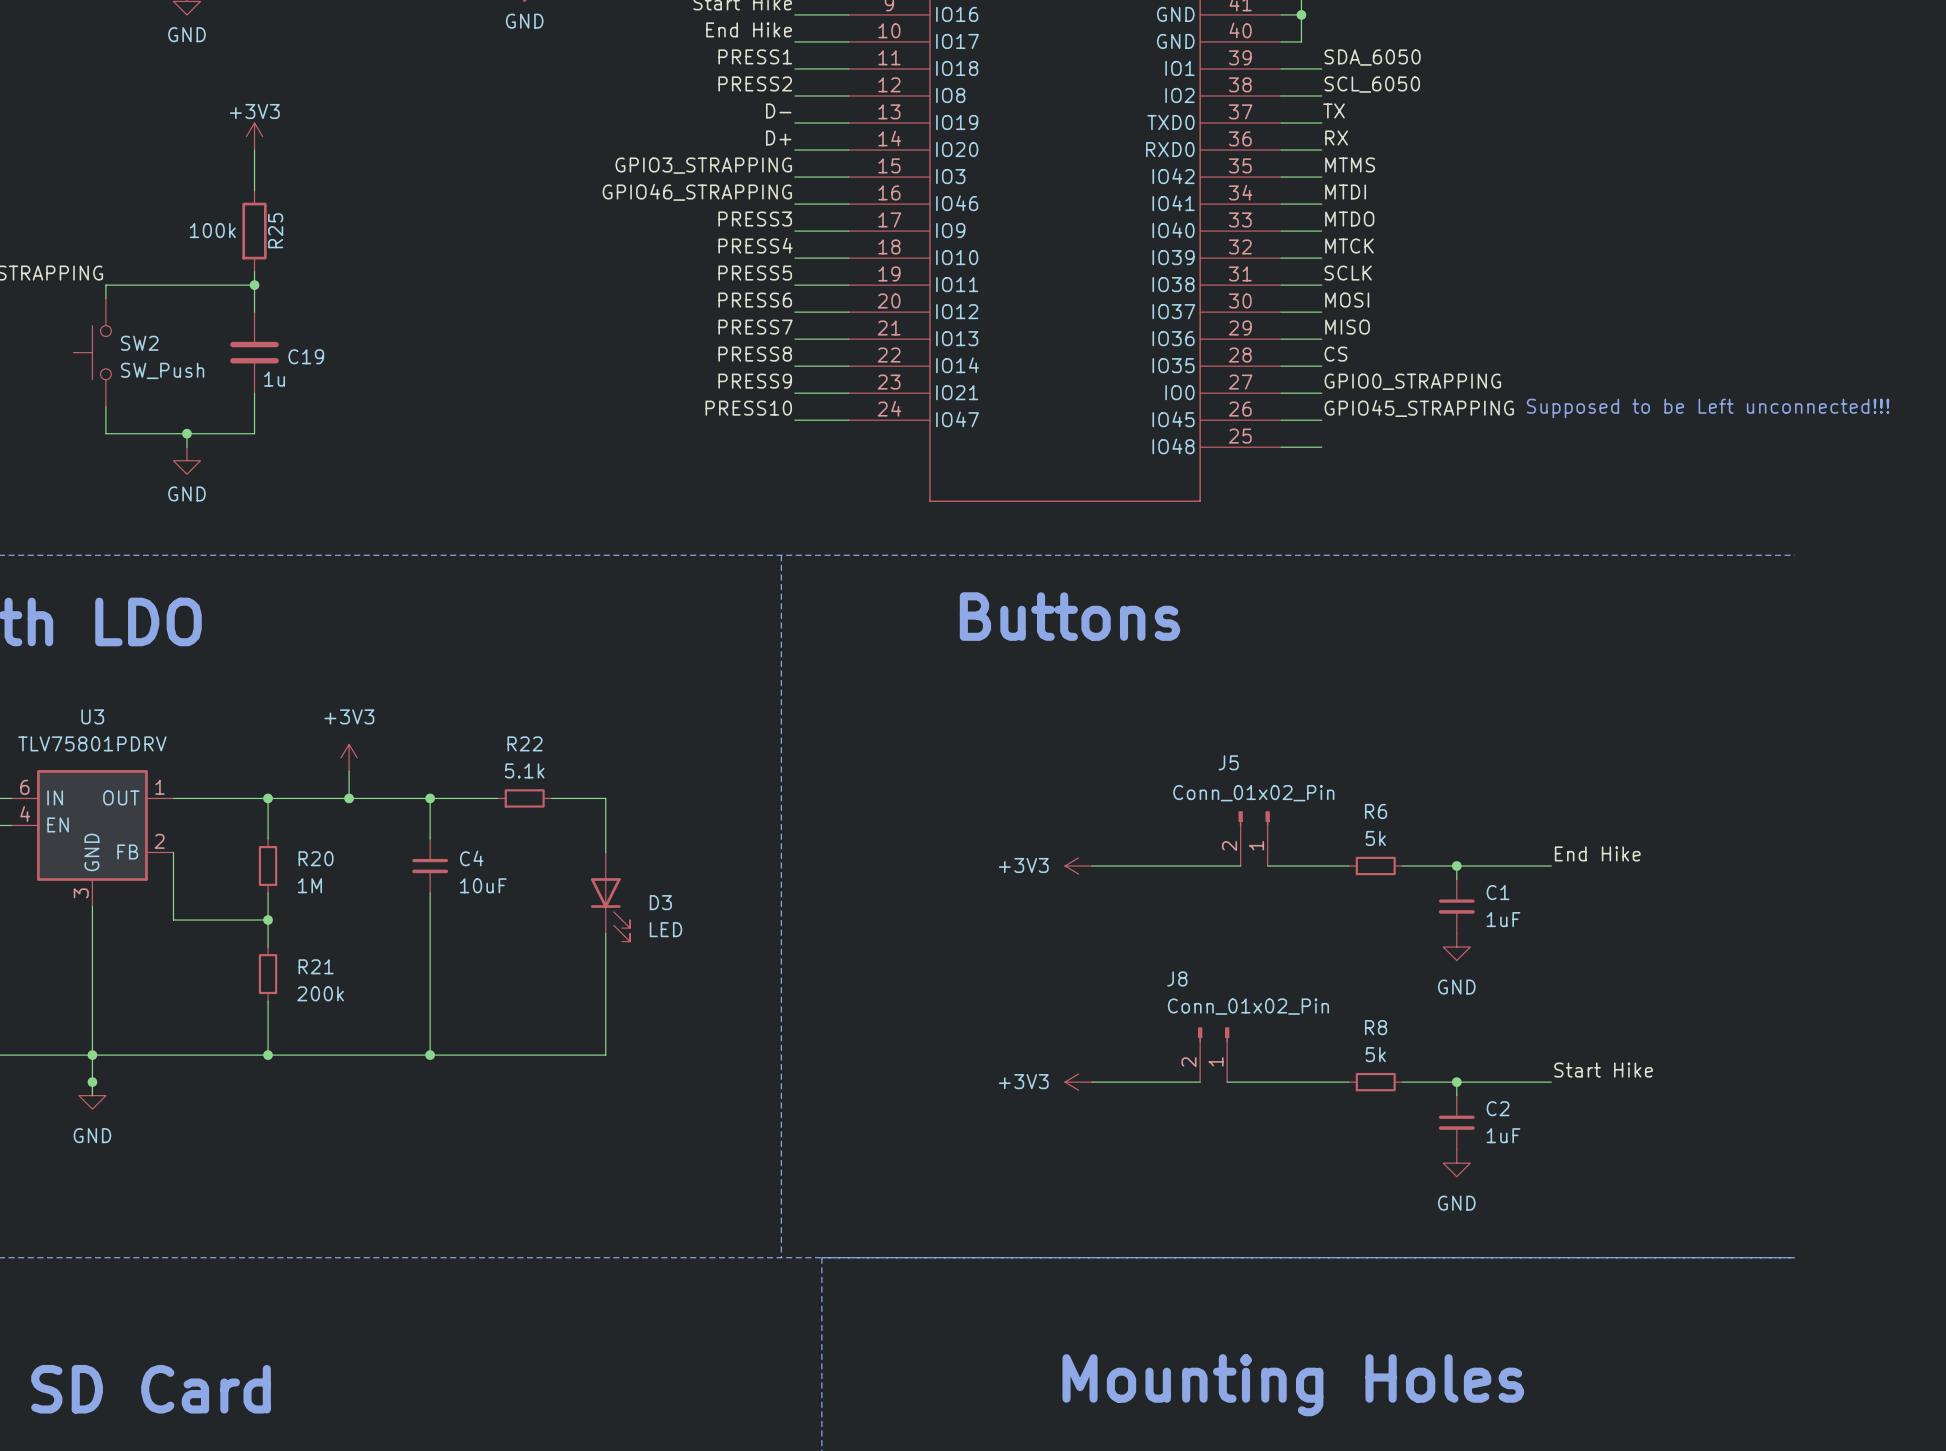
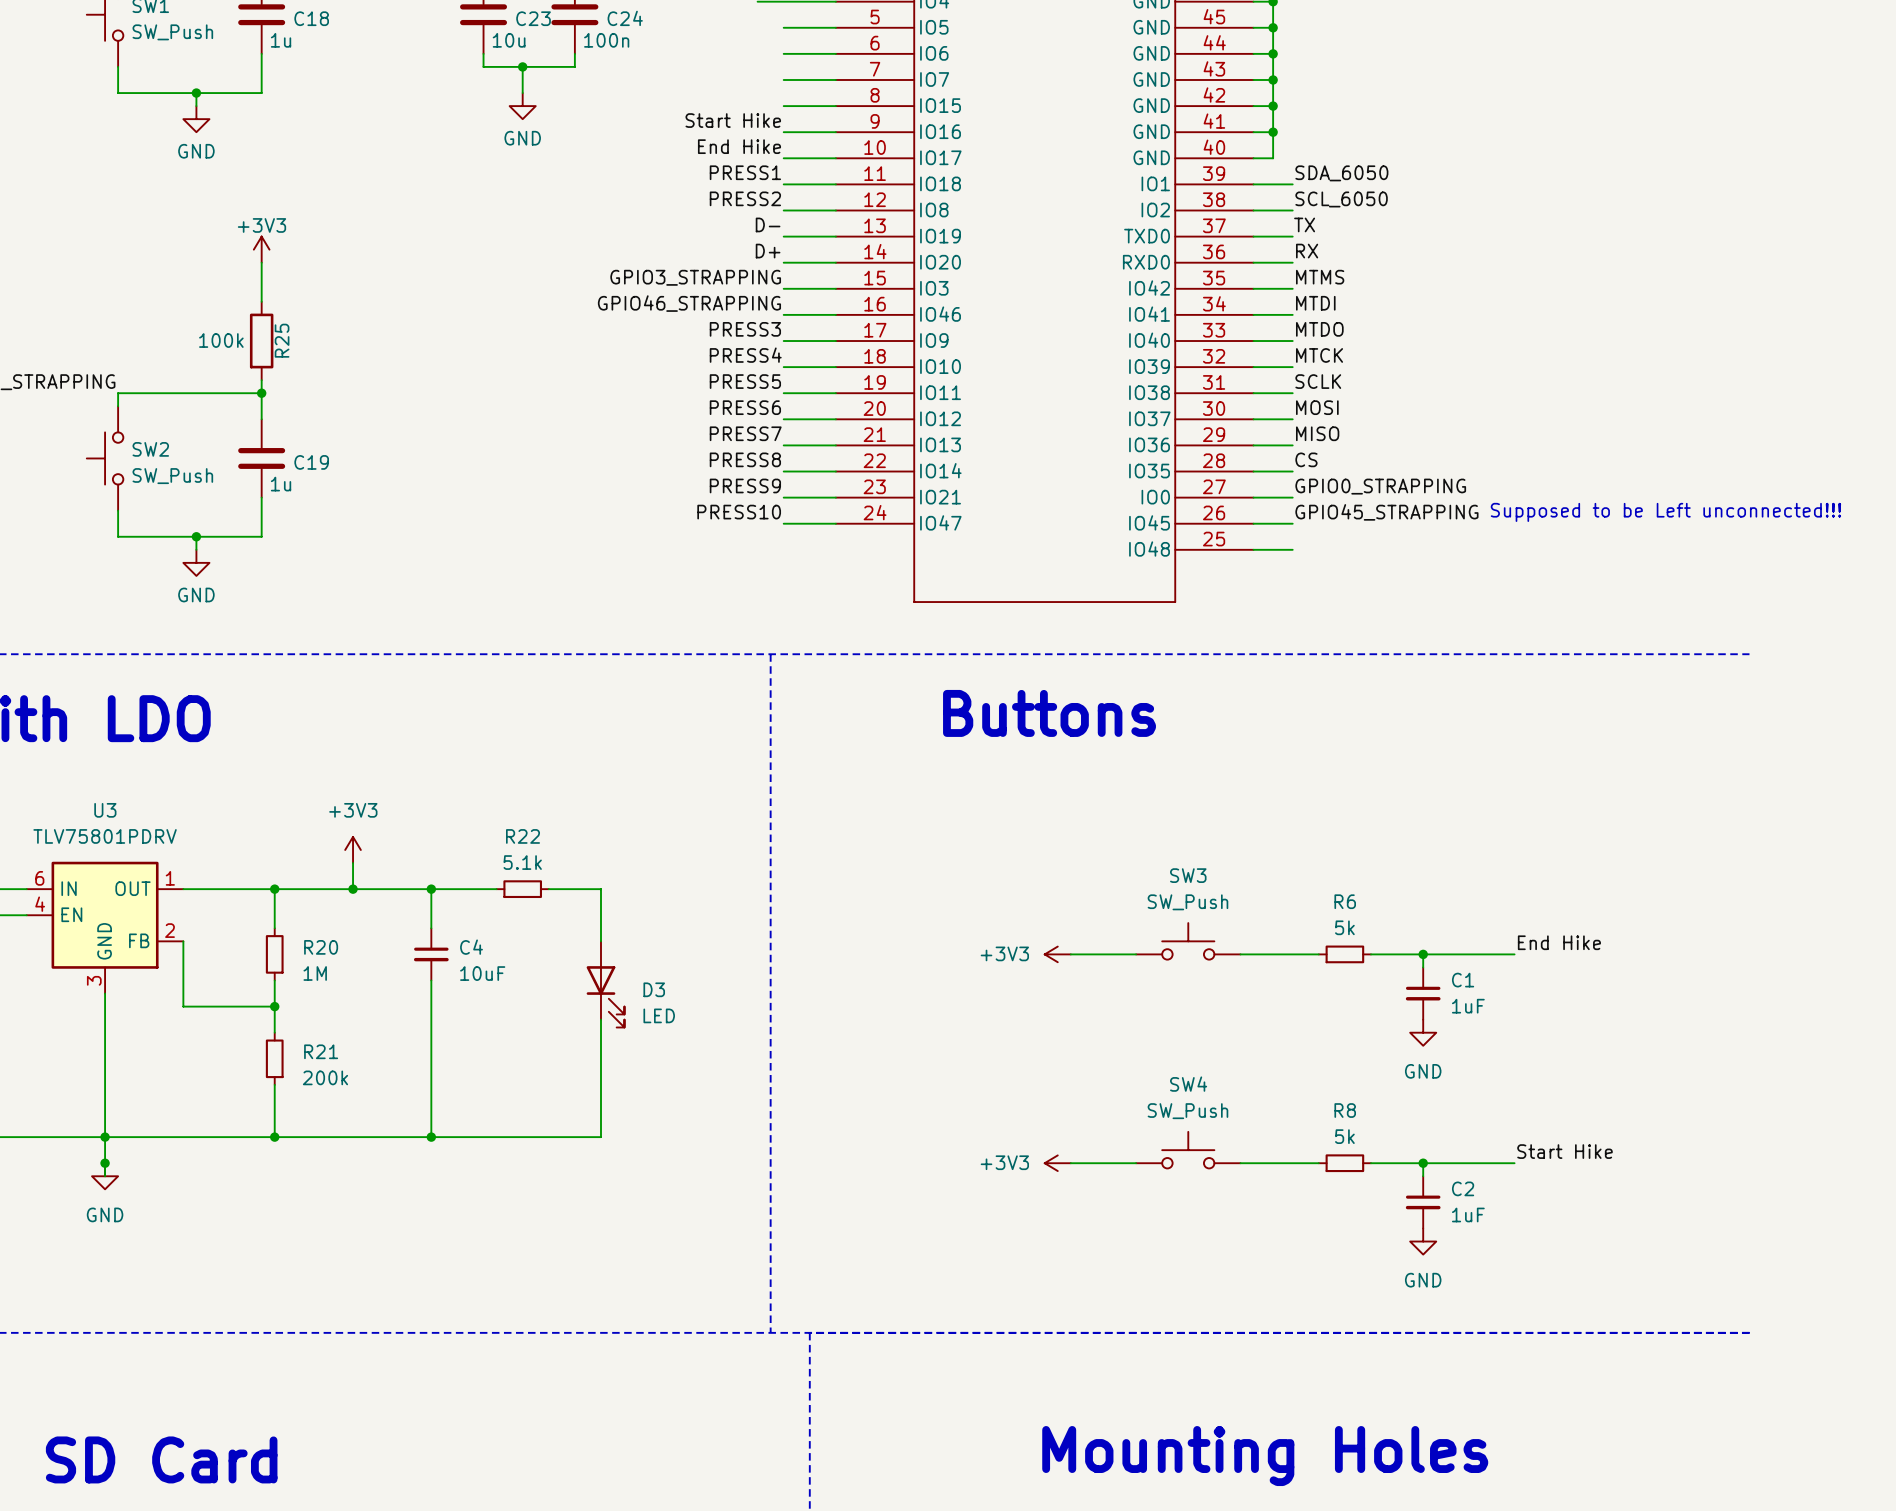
J5: Conn_01x02_Pin (1254, 838) -> none
SW3: none -> SW_Push (1188, 941)
wire: (1159, 865) (1240, 865) -> none
J8: Conn_01x02_Pin (1213, 1054) -> none
SW4: none -> SW_Push (1188, 1150)

